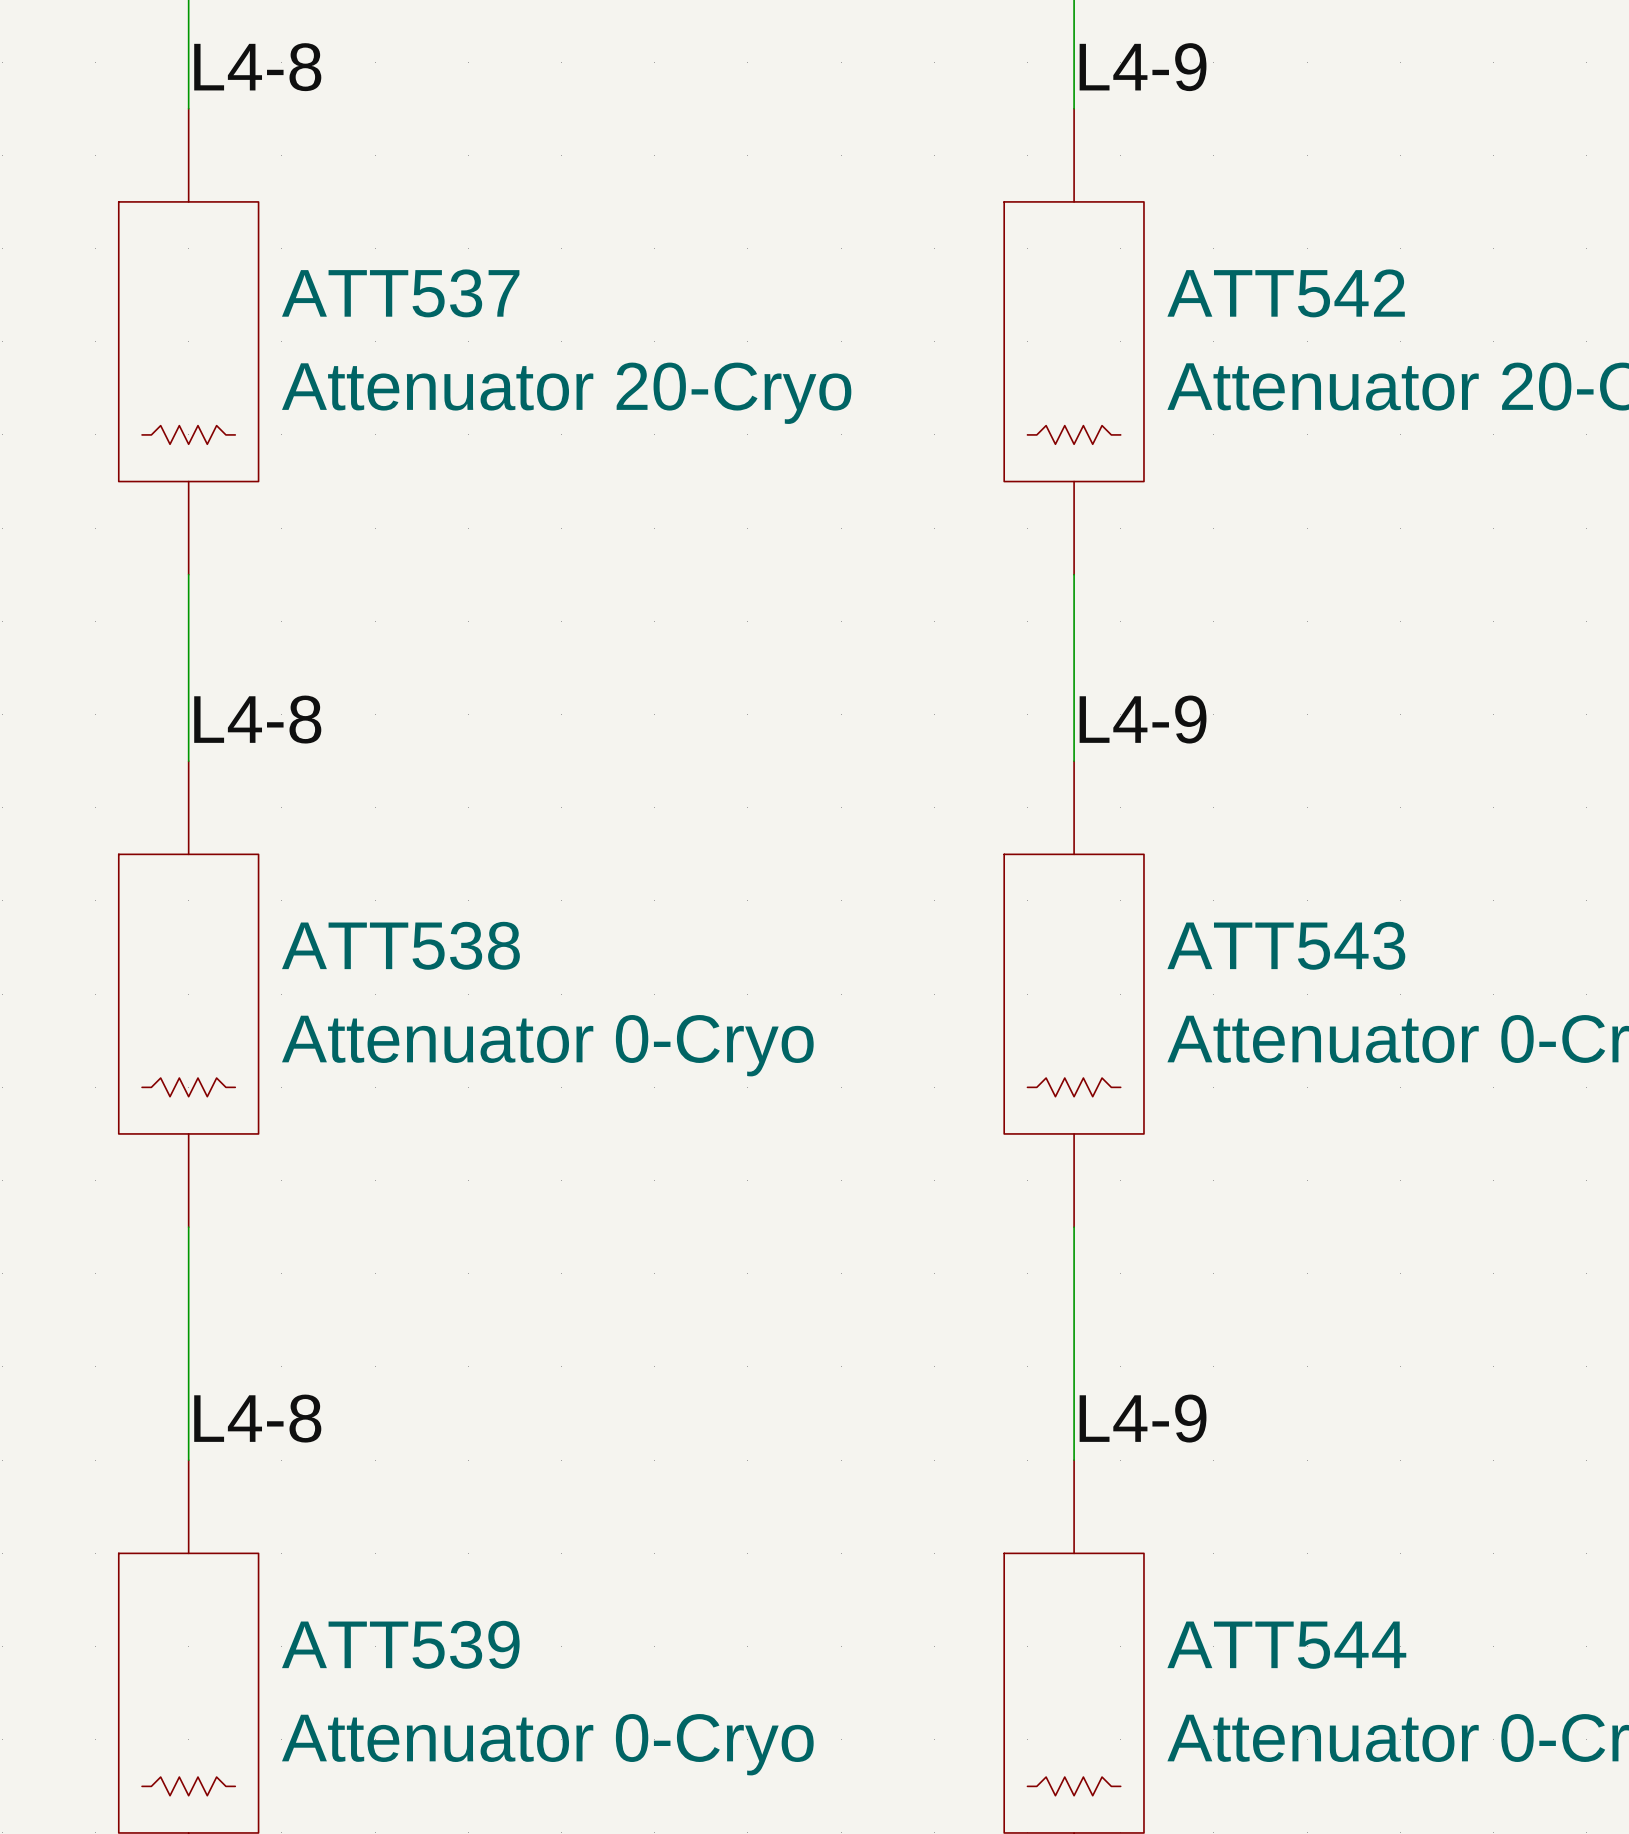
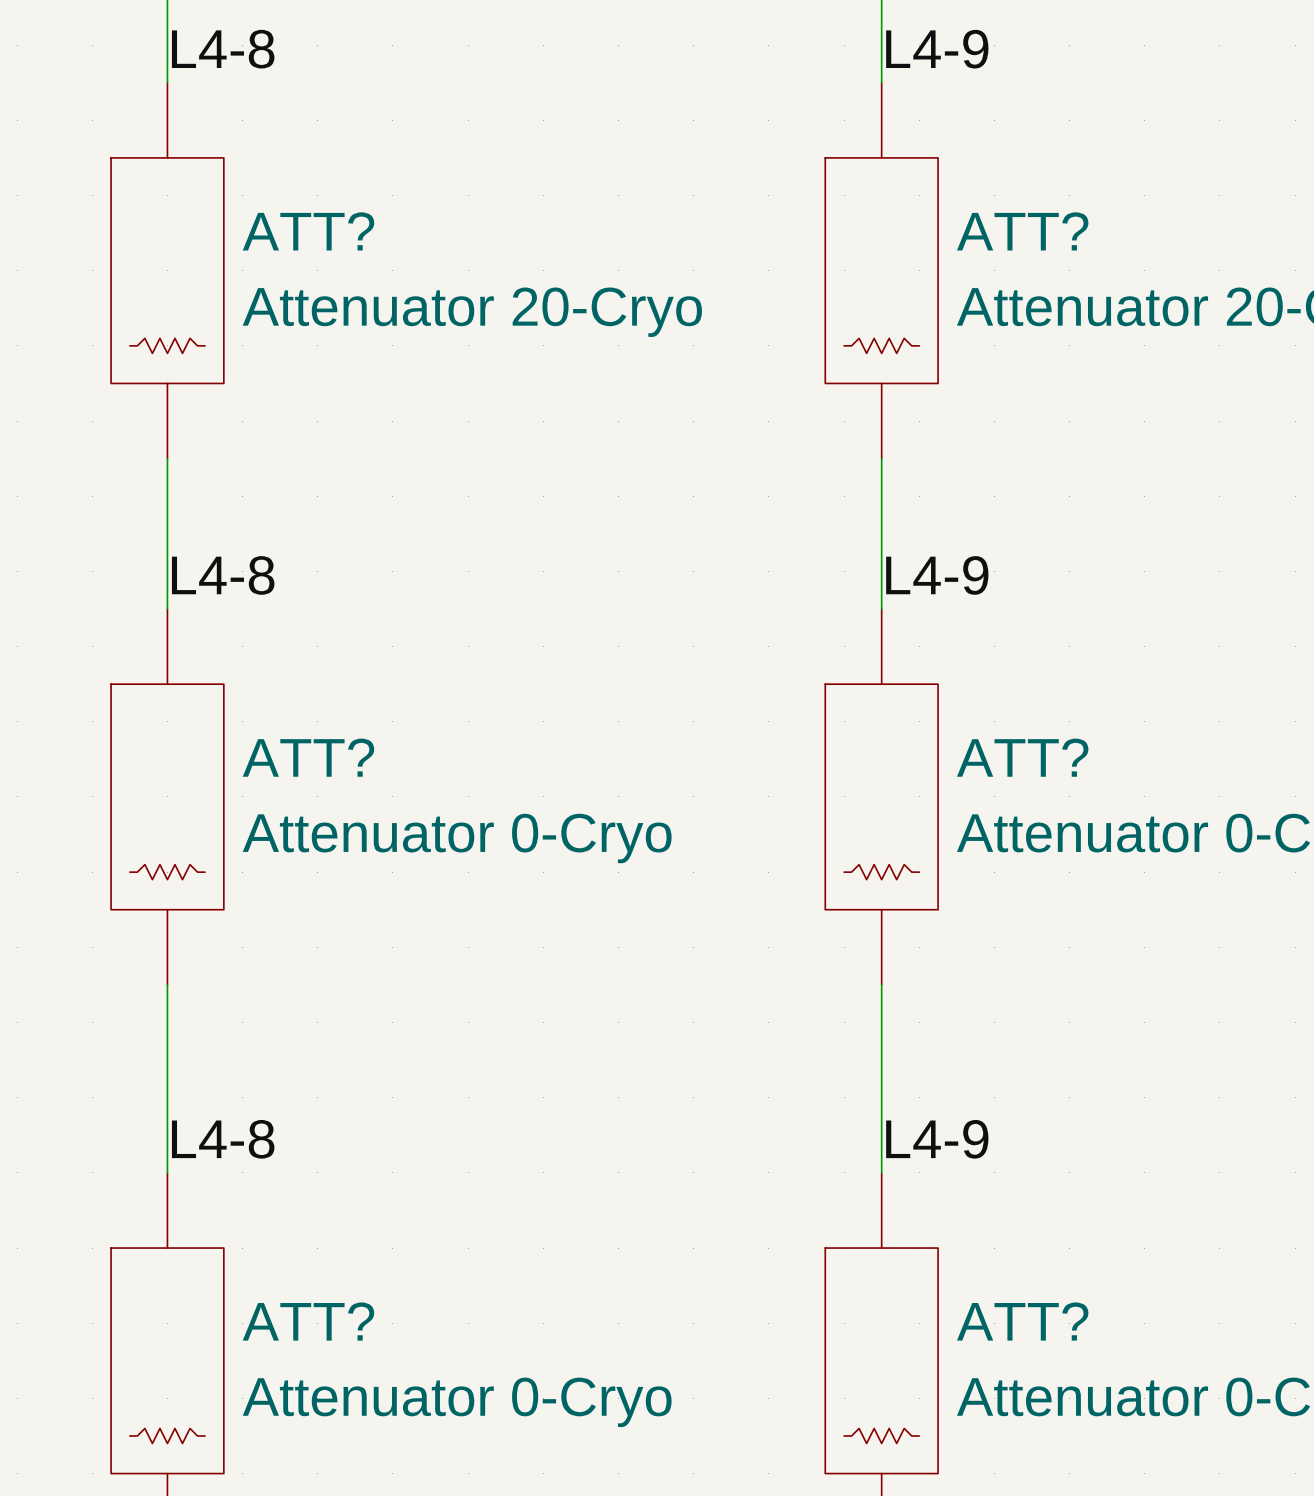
ATT537 name: ATT537 (400, 293) -> ATT? (308, 231)
ATT542 name: ATT542 (1286, 293) -> ATT? (1022, 231)
ATT538 name: ATT538 (400, 945) -> ATT? (308, 757)
ATT543 name: ATT543 (1286, 945) -> ATT? (1022, 757)
ATT539 name: ATT539 (400, 1644) -> ATT? (308, 1321)
ATT544 name: ATT544 (1286, 1645) -> ATT? (1022, 1321)

